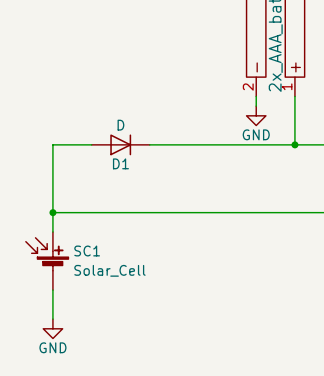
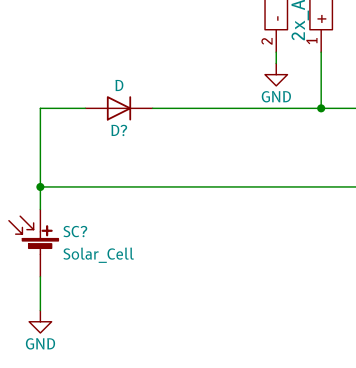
D1 name: D1 (120, 163) -> D? (119, 130)
SC1 name: SC1 (87, 251) -> SC? (75, 231)

